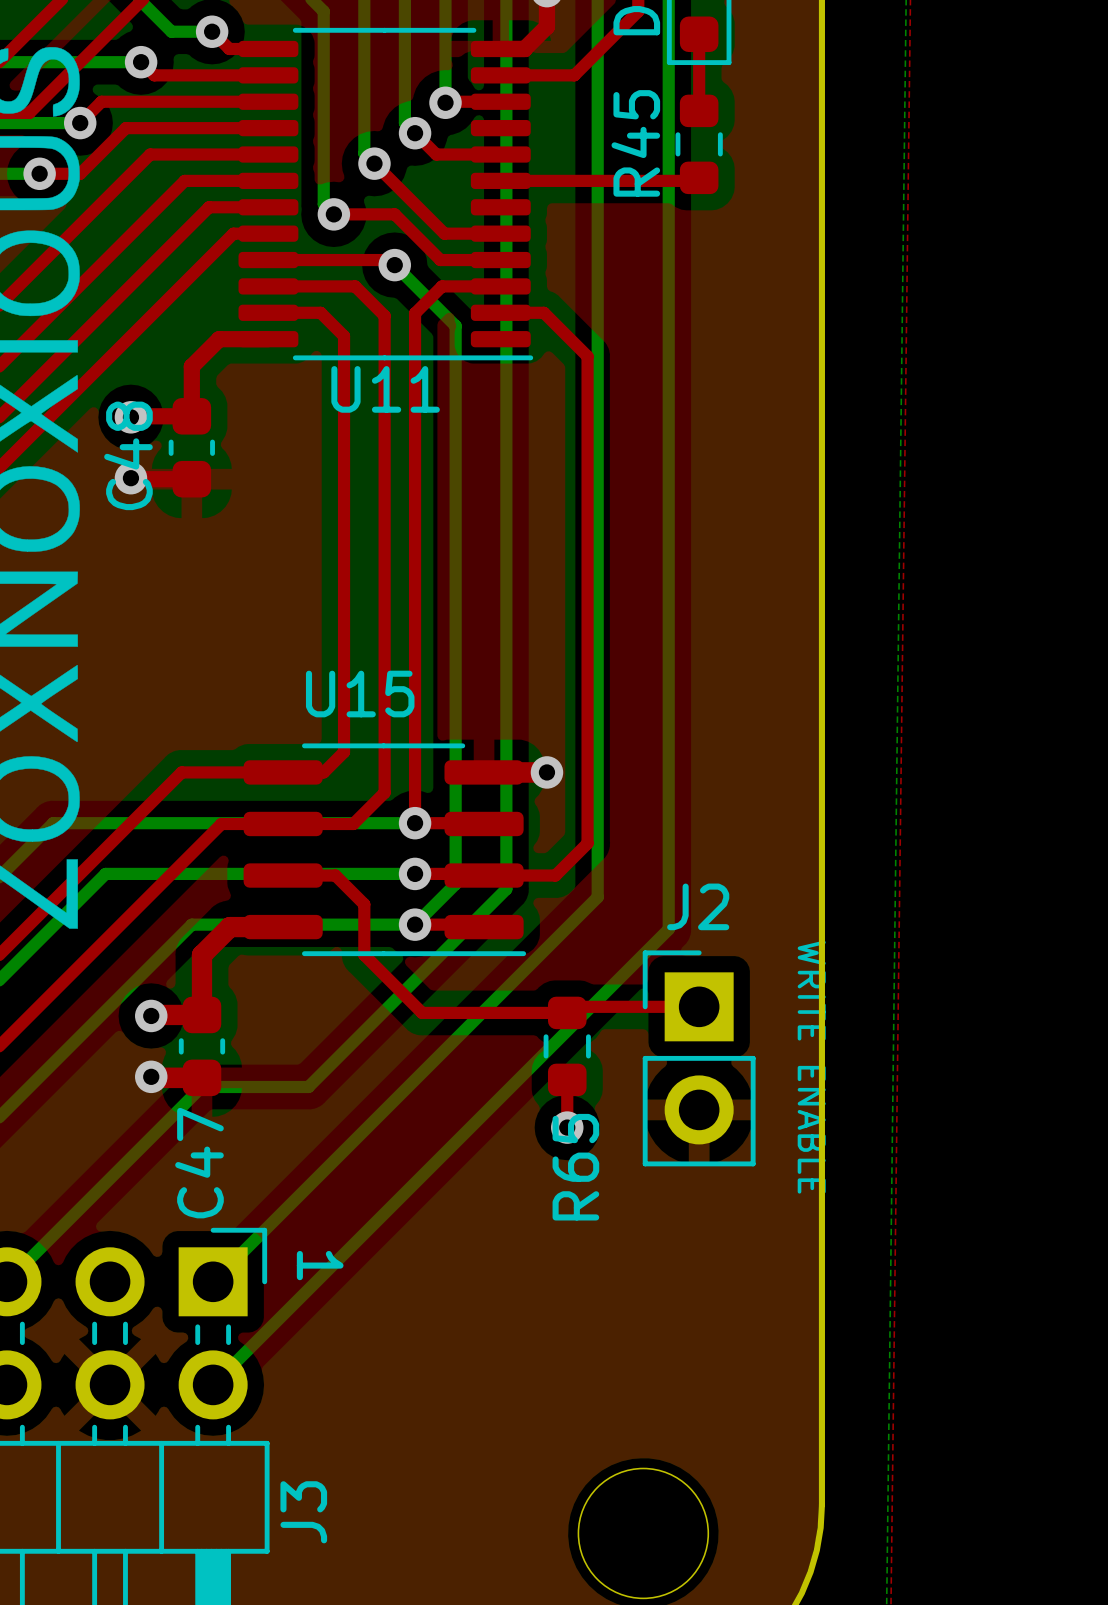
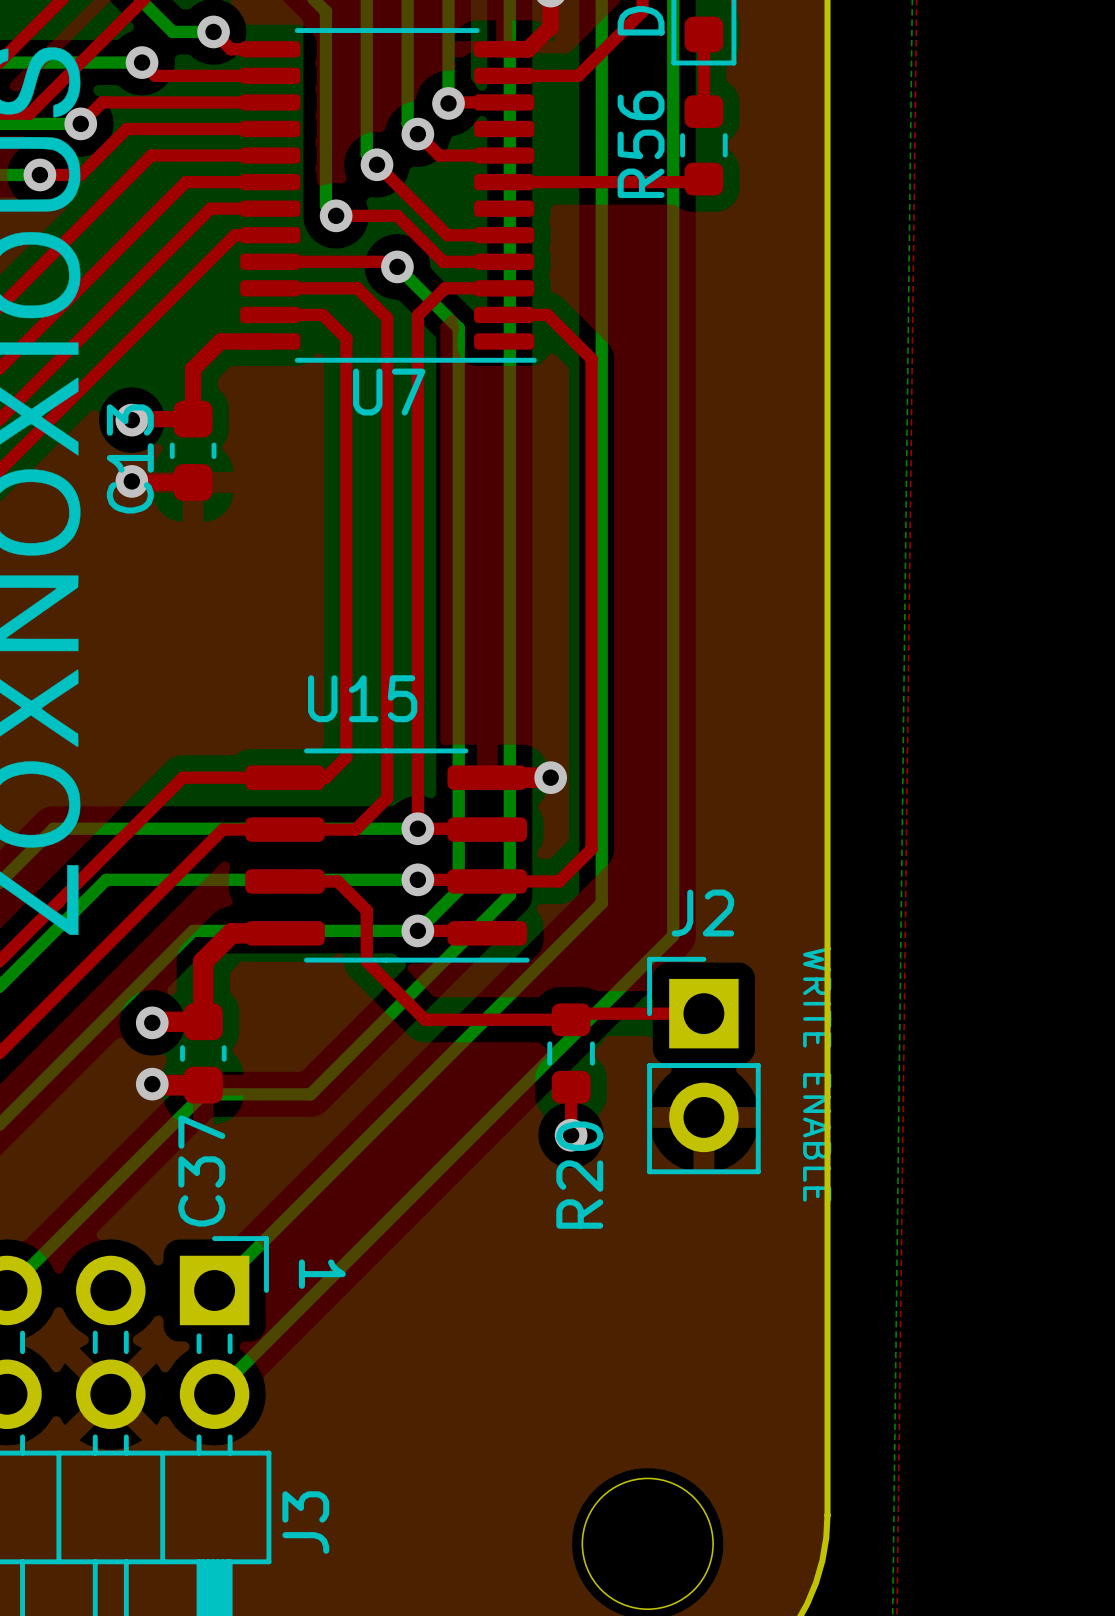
R45 name: R45 (635, 143) -> R56 (641, 144)
U11 name: U11 (385, 389) -> U7 (389, 392)
C48 name: C48 (128, 455) -> C13 (130, 458)
C47 name: C47 (199, 1163) -> C37 (201, 1171)
R65 name: R65 (575, 1167) -> R20 (579, 1175)

